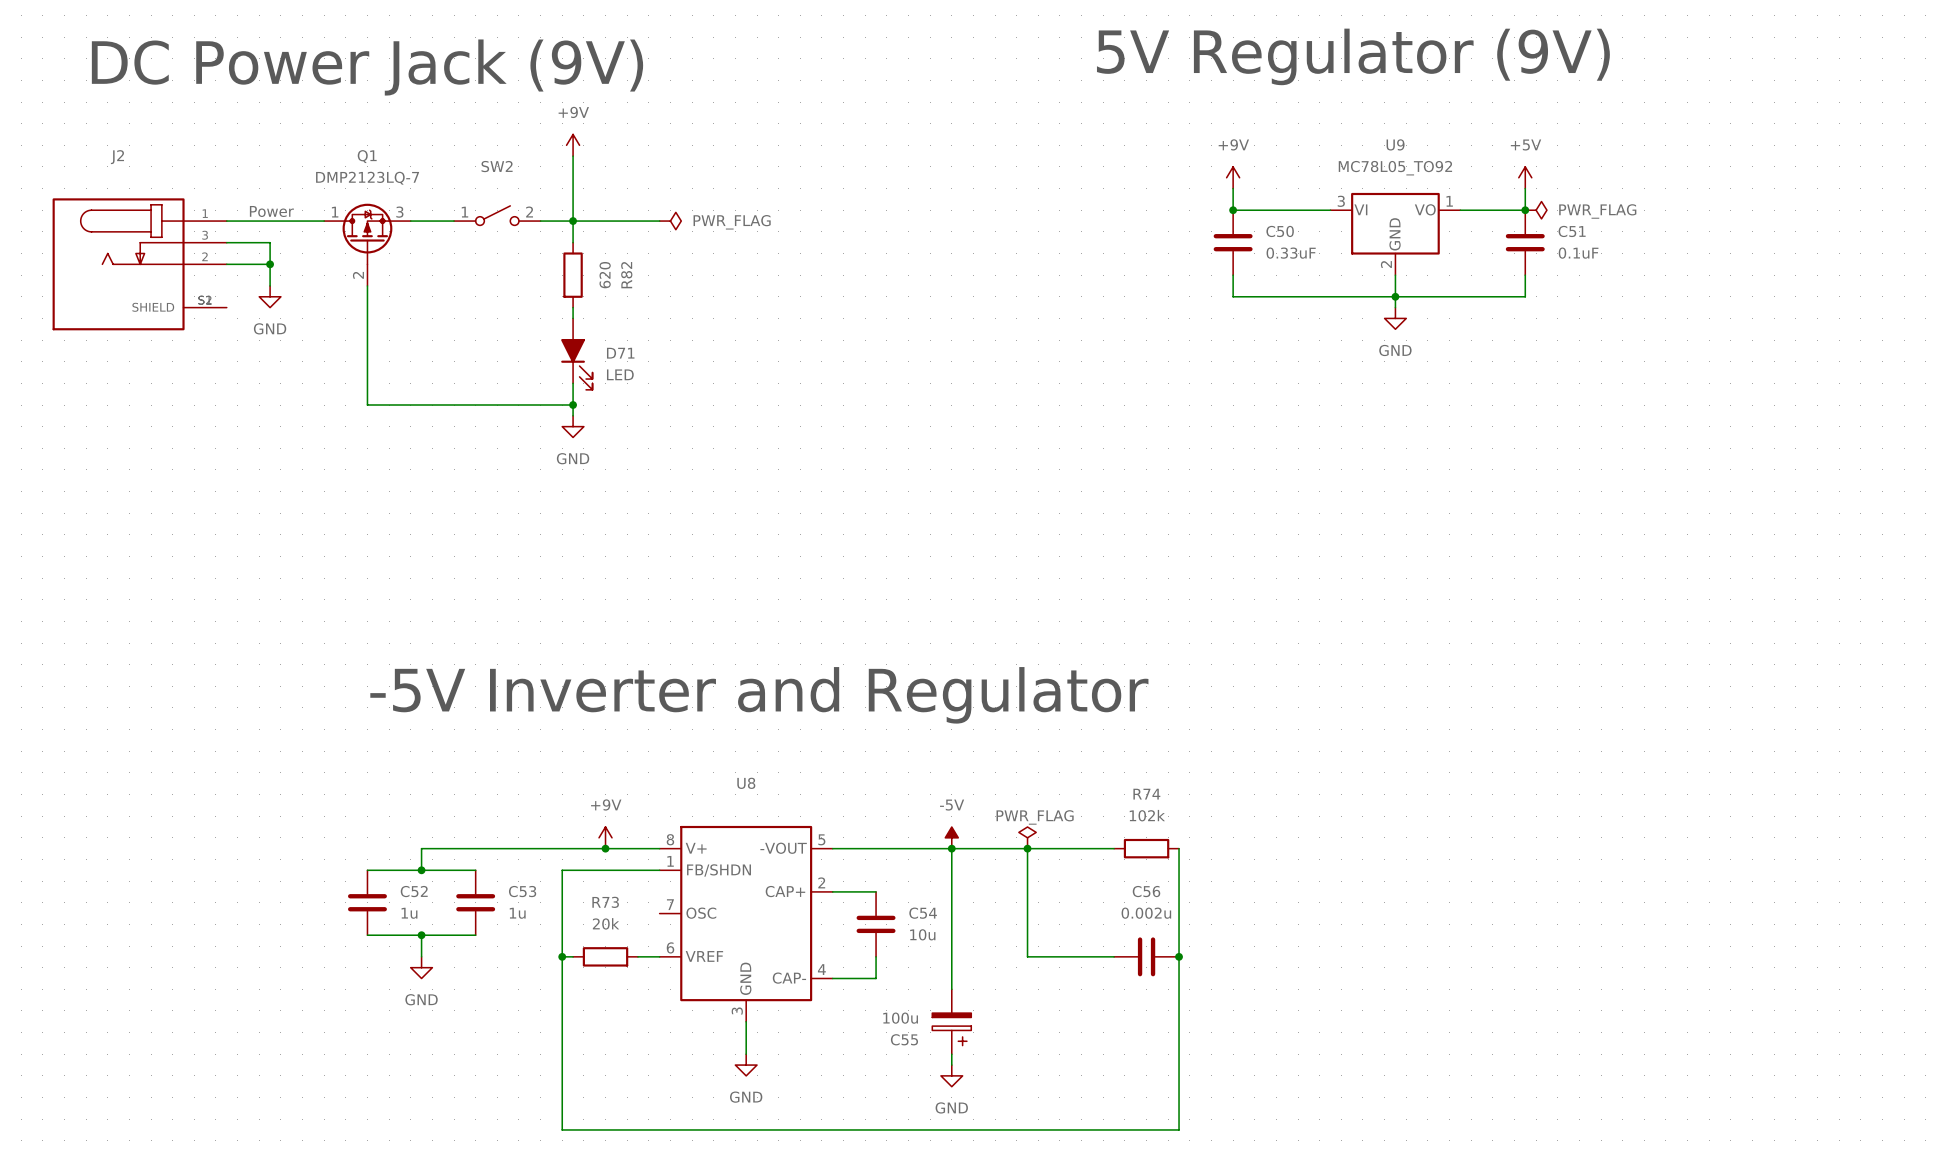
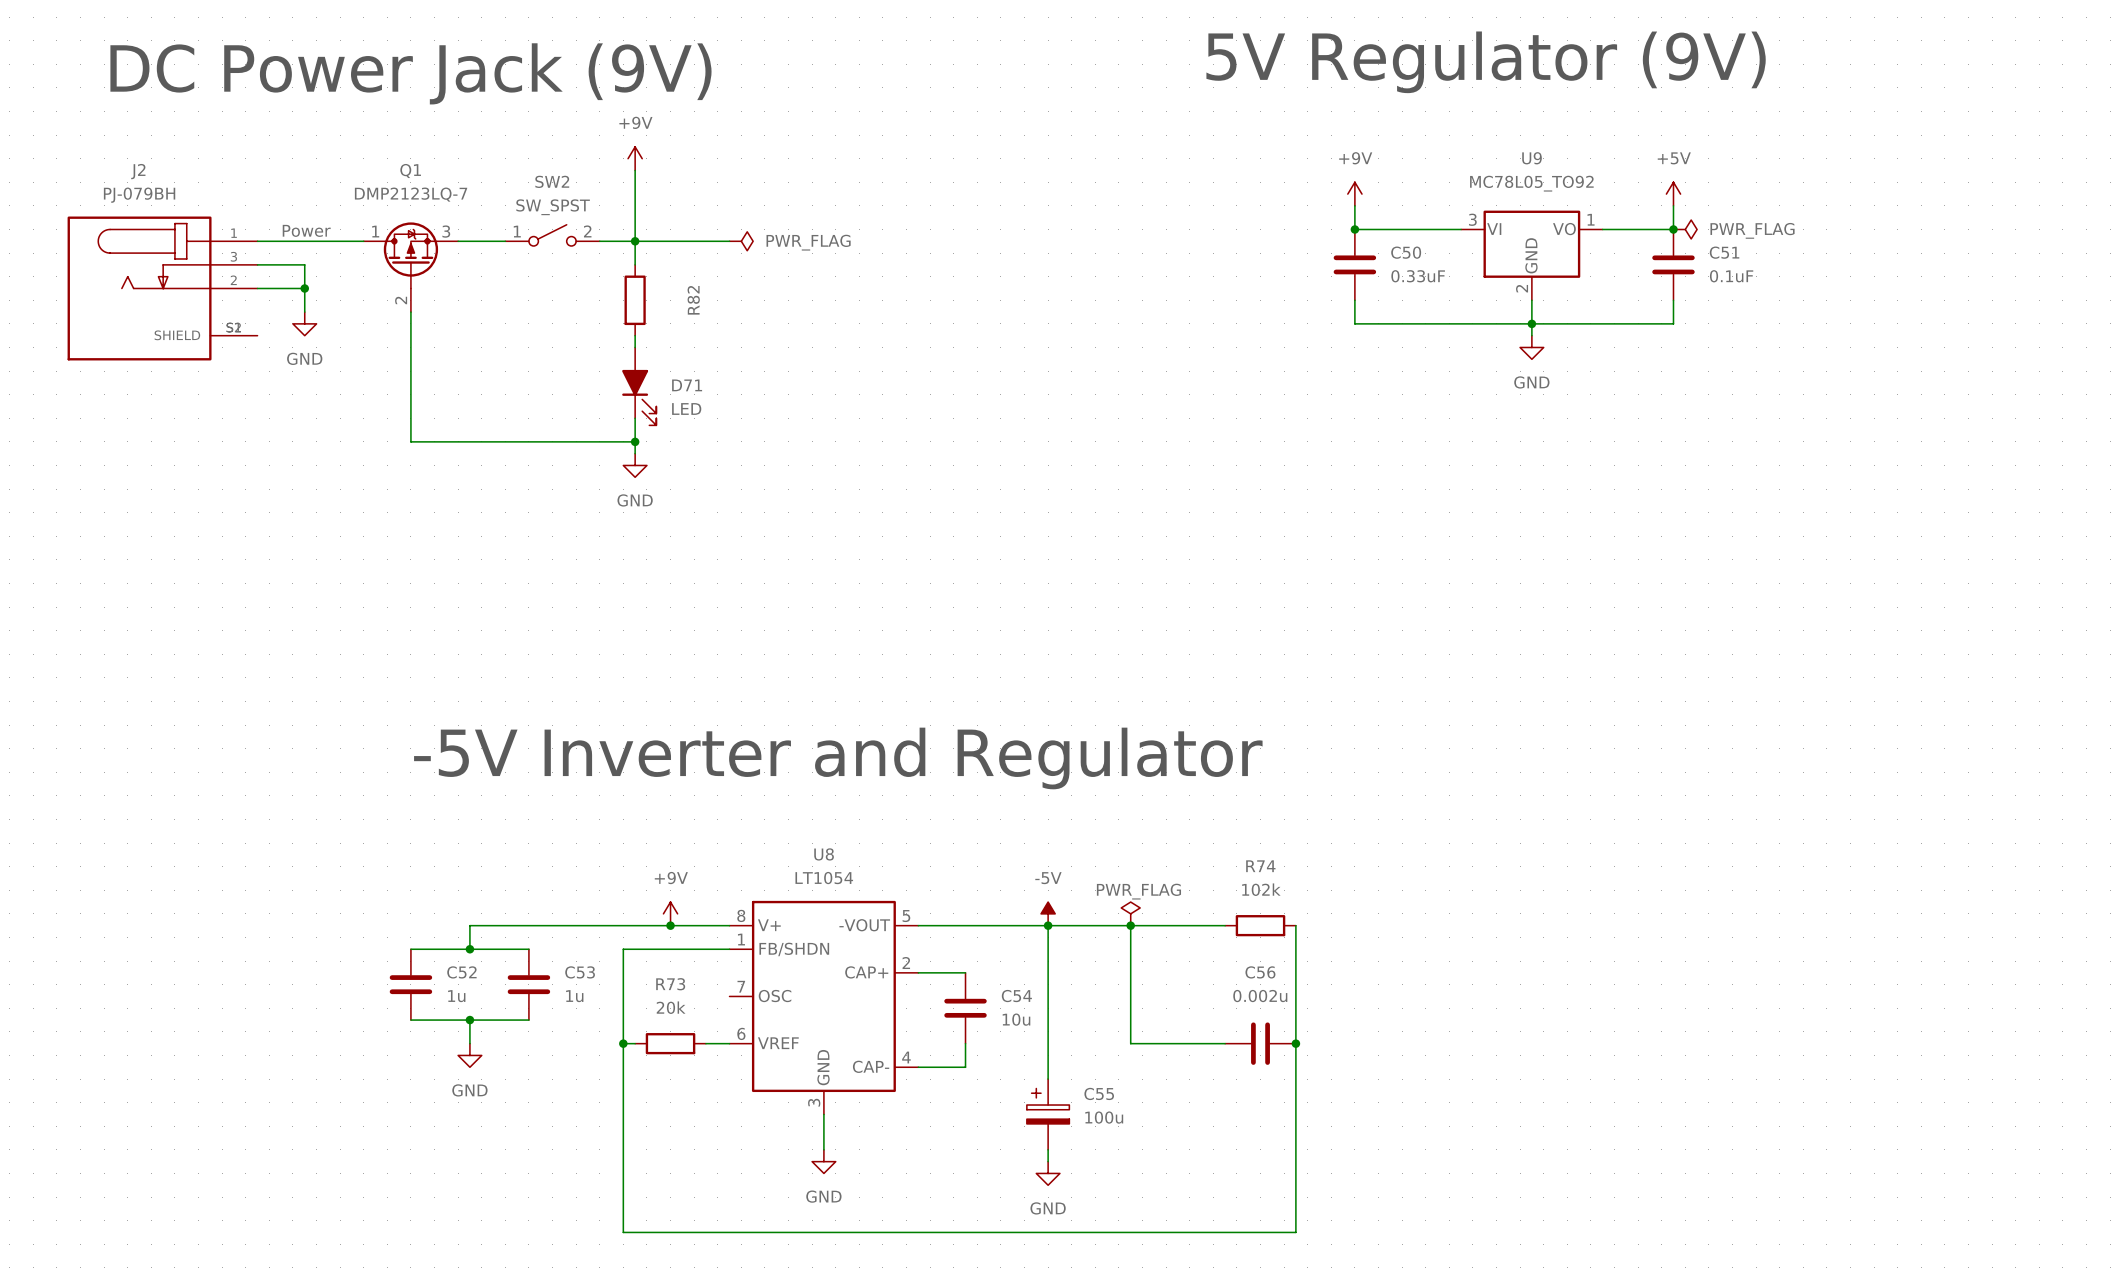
J2 value: none -> PJ-079BH (139, 195)
SW2 value: none -> SW_SPST (553, 207)
R82 value: 620 (605, 275) -> none
U8 value: none -> LT1054 (824, 878)
C55 rotation: 0° (951, 1029) -> 180° (1048, 1106)

